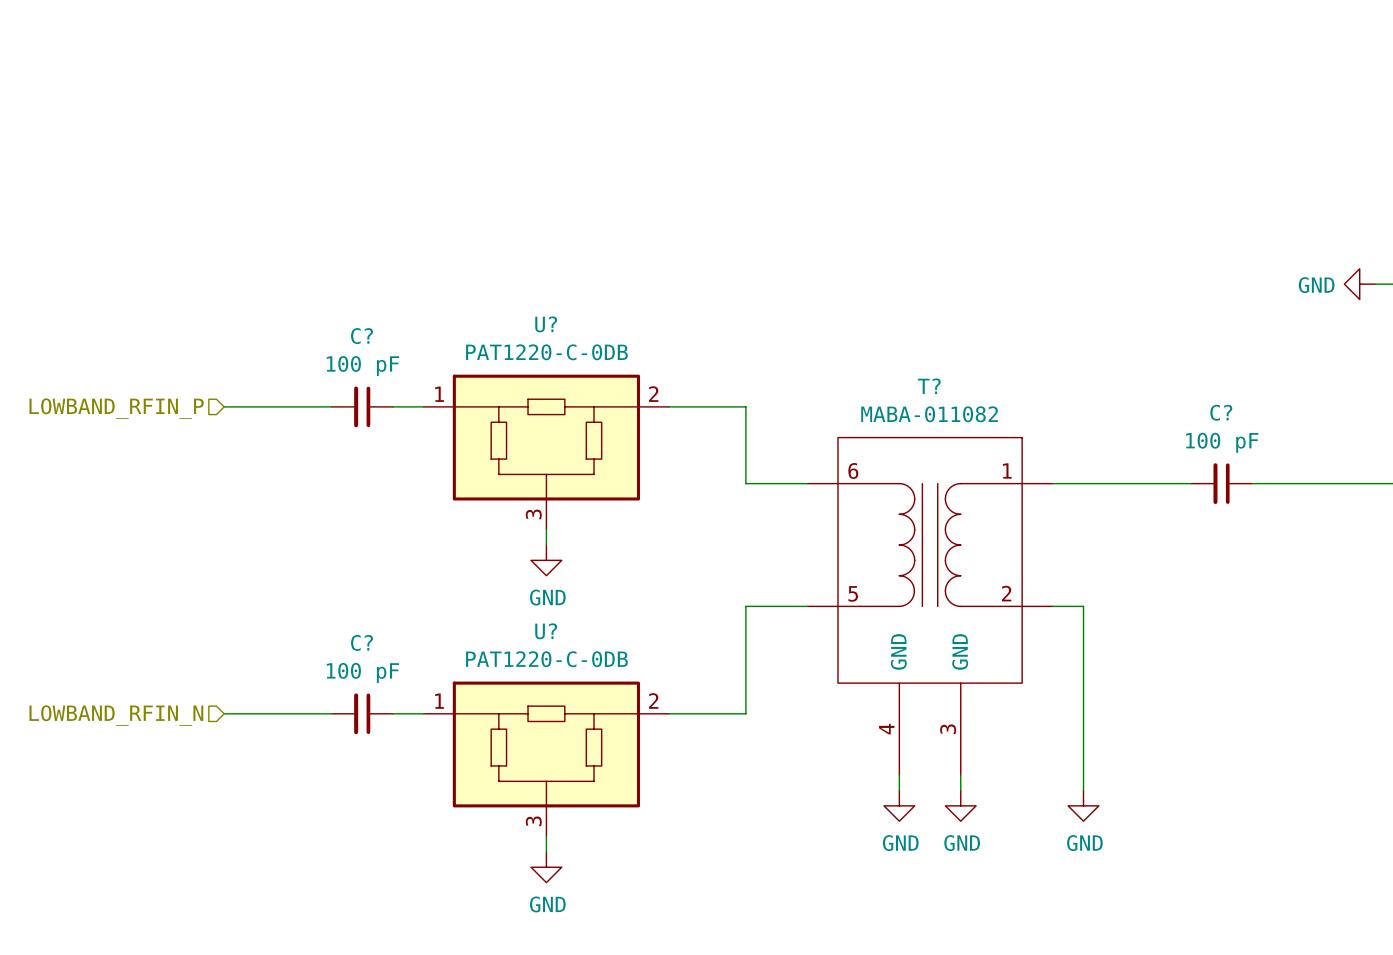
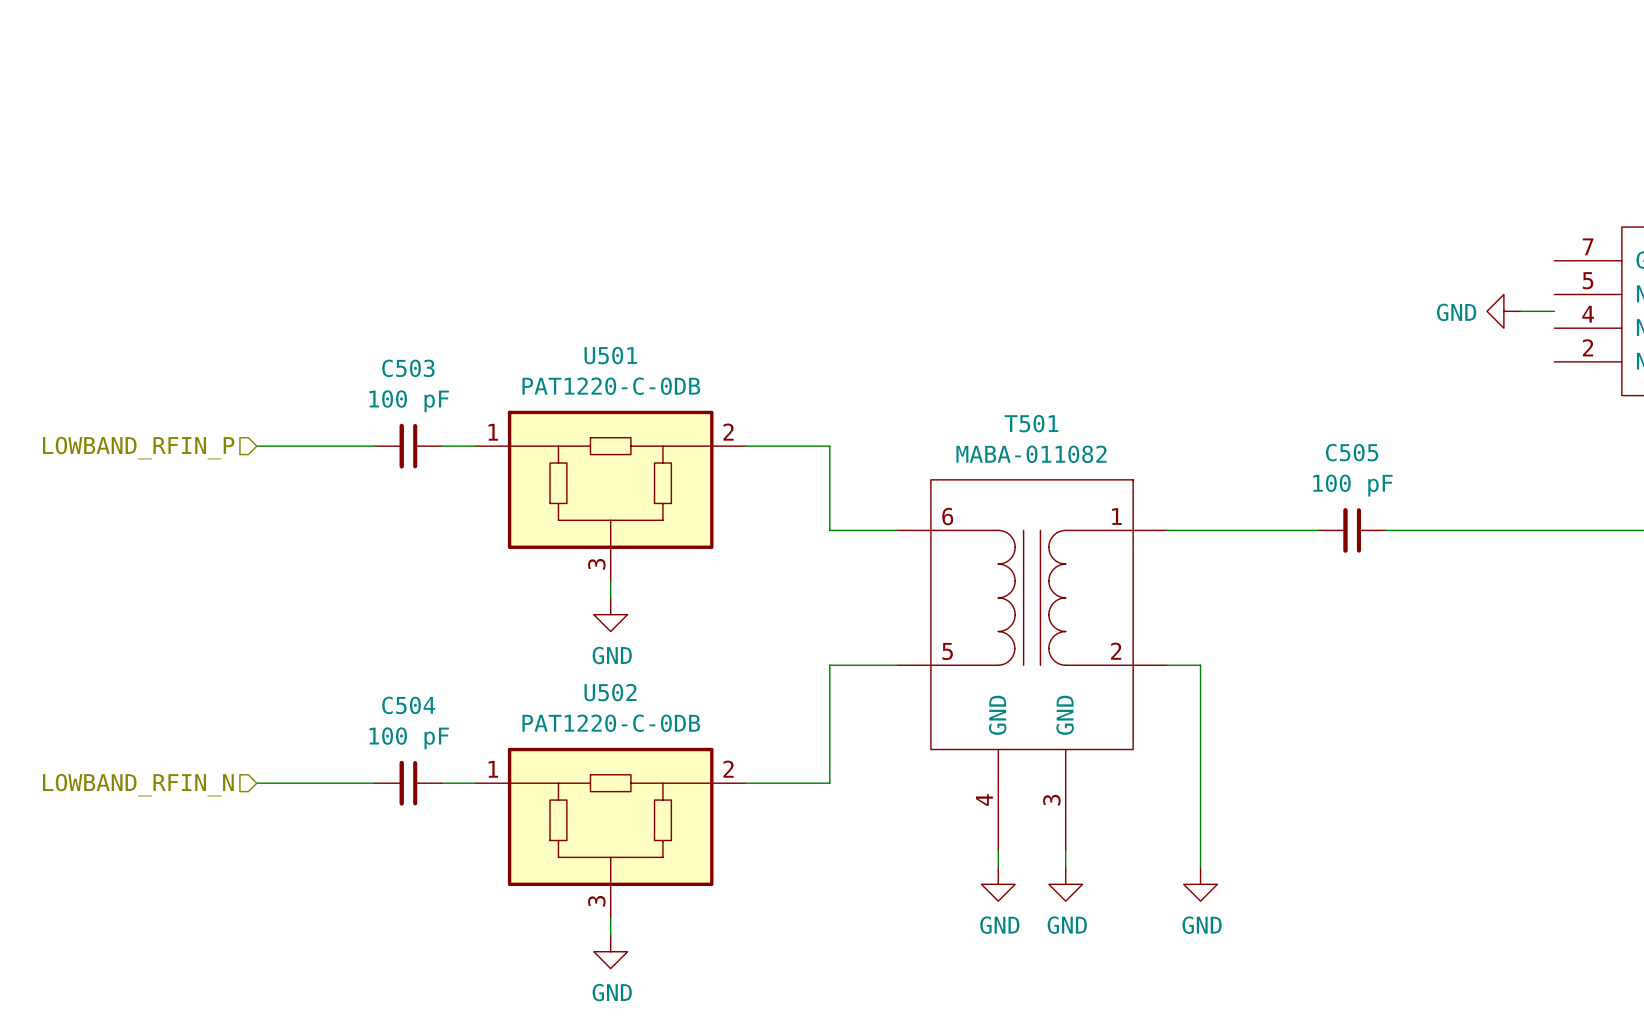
U? name: U? (546, 324) -> U501 (610, 355)
C? name: C? (362, 336) -> C503 (408, 368)
T? name: T? (929, 386) -> T501 (1031, 423)
C? name: C? (1221, 412) -> C505 (1352, 452)
U? name: U? (546, 631) -> U502 (610, 692)
C? name: C? (362, 642) -> C504 (408, 705)

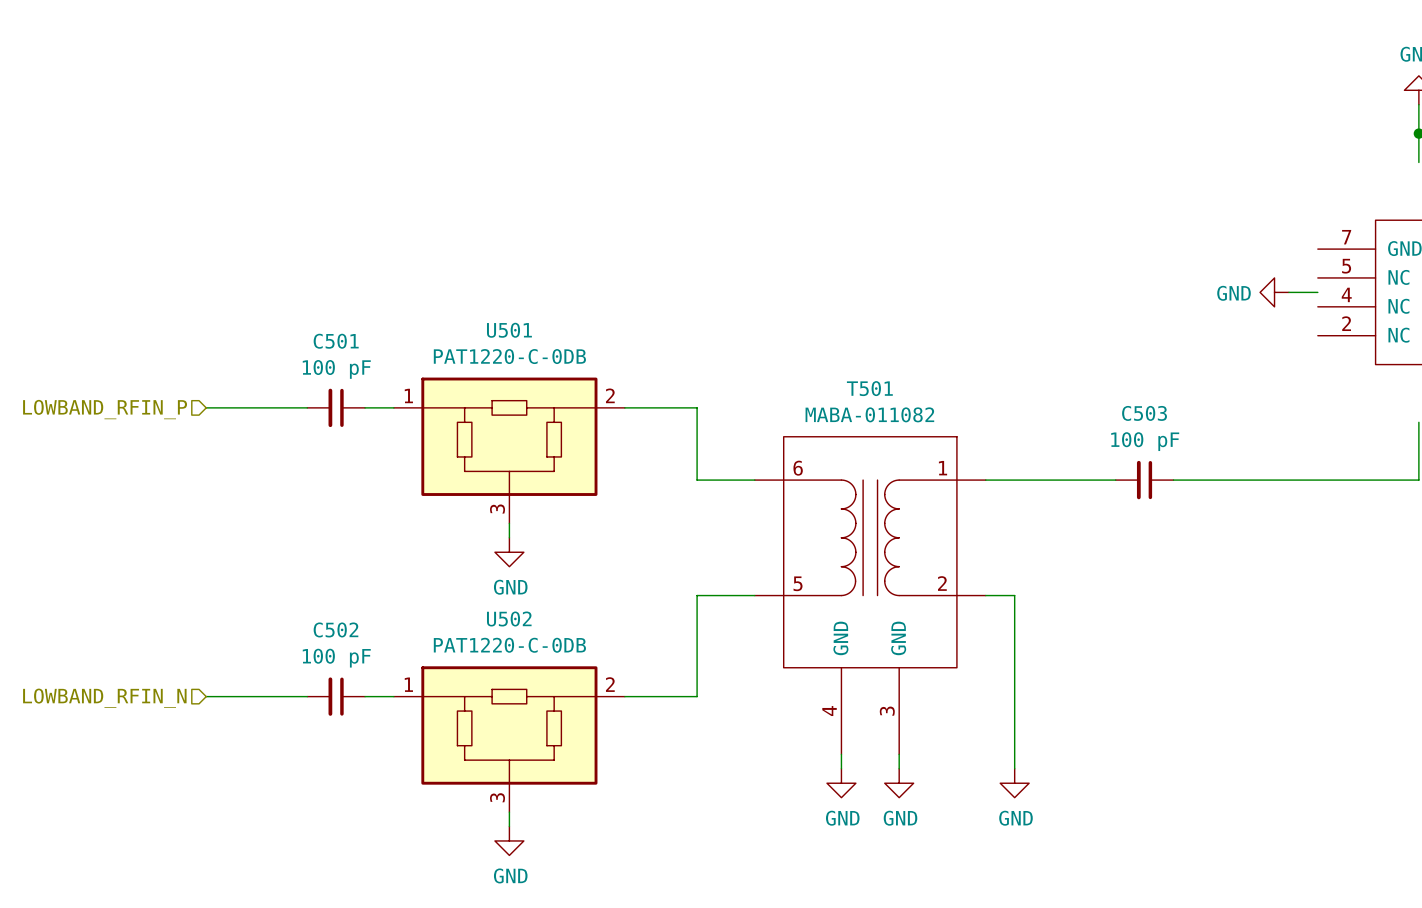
C503 name: C503 (408, 368) -> C501 (336, 341)
C505 name: C505 (1352, 452) -> C503 (1144, 413)
C504 name: C504 (408, 705) -> C502 (336, 629)

